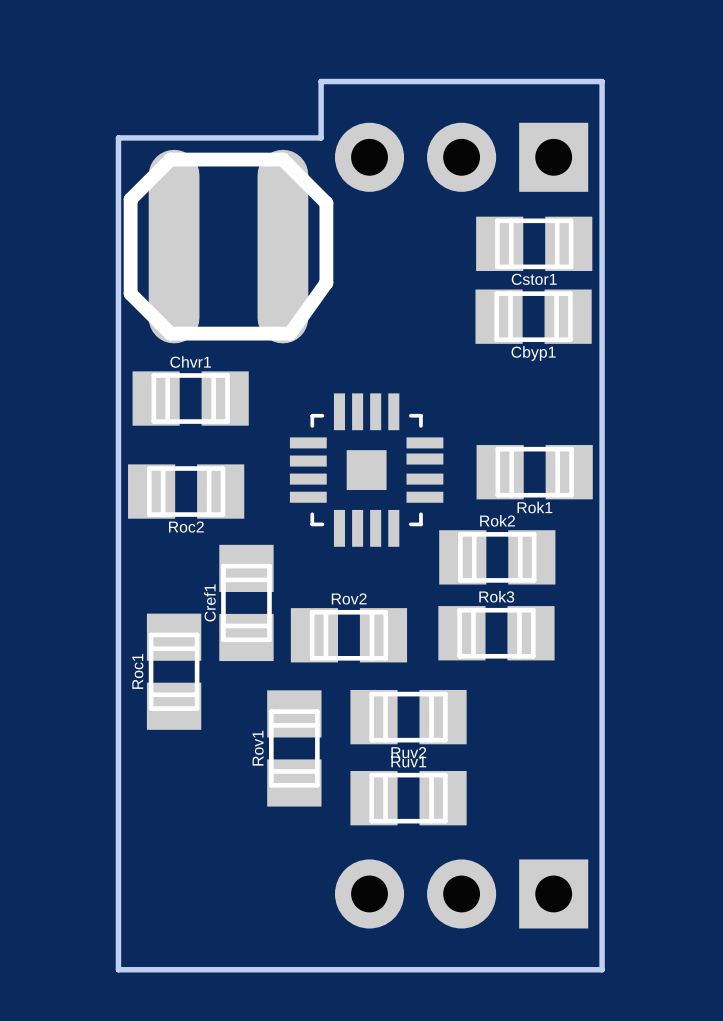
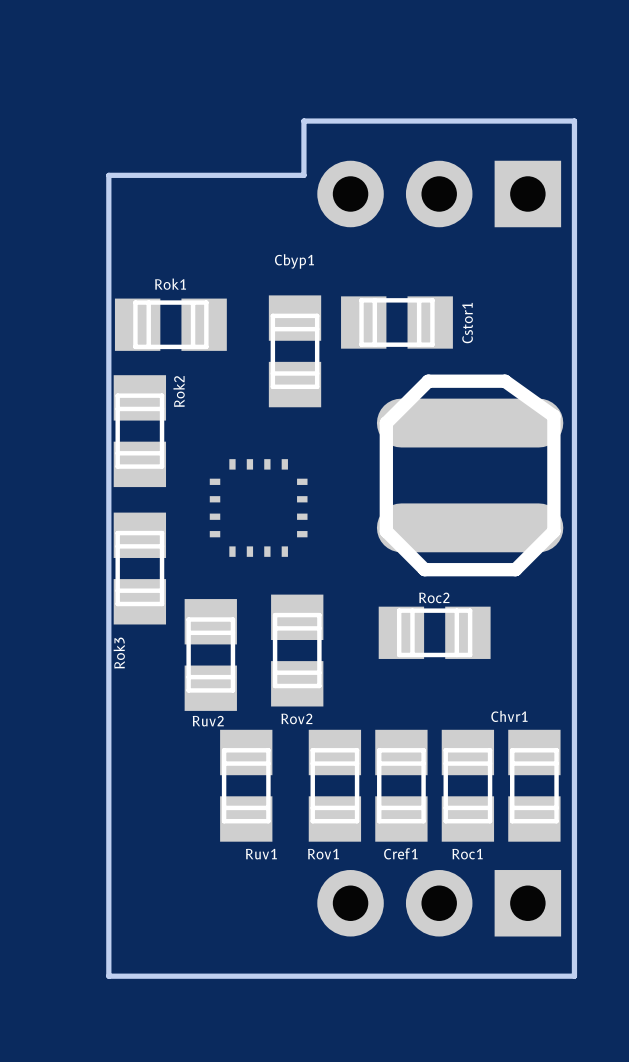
Cstor1 position: (534, 243) -> (396, 322)
part rotation: 0° (228, 246) -> 90° counterclockwise (470, 475)
part position: (228, 246) -> (470, 475)
Cstor1 name rotation: 0° (534, 279) -> 90° counterclockwise (467, 323)
Cbyp1 rotation: 0° (533, 316) -> 90° counterclockwise (295, 351)
Cbyp1 position: (533, 316) -> (295, 351)
Cbyp1 name position: Cbyp1 (533, 353) -> Cbyp1 (294, 261)
Chvr1 rotation: 0° (190, 398) -> 90° clockwise (534, 785)
Chvr1 position: (190, 398) -> (534, 785)
part: (366, 470) -> none
Rok1 position: (534, 472) -> (170, 324)
part: none -> (258, 508)
Roc2 rotation: 0° (186, 491) -> 180° (434, 632)
Roc2 position: (186, 491) -> (434, 632)
Rok1 name position: Rok1 (534, 507) -> Rok1 (170, 284)
Rok2 rotation: 0° (497, 557) -> 90° counterclockwise (139, 431)
Rok2 position: (497, 557) -> (139, 431)
Rok3 name position: Rok3 (496, 596) -> Rok3 (119, 653)
Rov2 name position: Rov2 (349, 598) -> Rov2 (296, 718)
Cref1 name rotation: 0° (209, 602) -> 90° clockwise (400, 853)
Cref1 name position: Cref1 (209, 602) -> Cref1 (400, 853)
Cref1 position: (246, 602) -> (401, 785)
Rok3 rotation: 0° (496, 633) -> 90° counterclockwise (139, 568)
Rok3 position: (496, 633) -> (139, 568)
Rov2 rotation: 0° (348, 635) -> 90° clockwise (297, 650)
Roc1 name rotation: 0° (137, 671) -> 90° clockwise (467, 854)
Roc1 name position: Roc1 (137, 671) -> Roc1 (467, 854)
Roc1 position: (174, 671) -> (467, 785)
Ruv2 rotation: 0° (408, 717) -> 90° counterclockwise (210, 654)
Ruv2 position: (408, 717) -> (210, 654)
Rov1 name rotation: 0° (258, 748) -> 90° clockwise (323, 854)
Rov1 name position: Rov1 (258, 748) -> Rov1 (323, 854)
Rov1 position: (294, 748) -> (334, 785)
Ruv1 name position: Ruv1 (408, 761) -> Ruv1 (261, 854)
Ruv1 rotation: 0° (408, 798) -> 90° counterclockwise (246, 785)
Ruv1 position: (408, 798) -> (246, 785)

